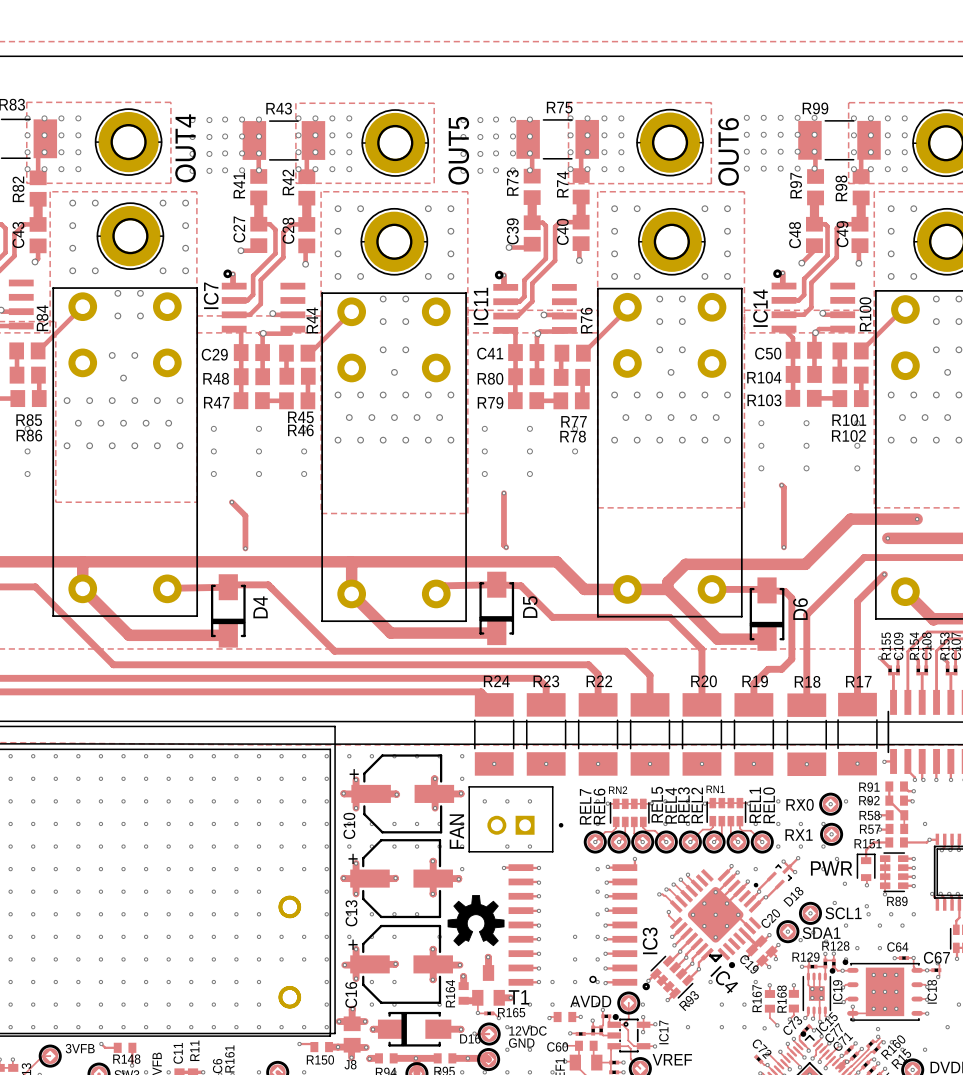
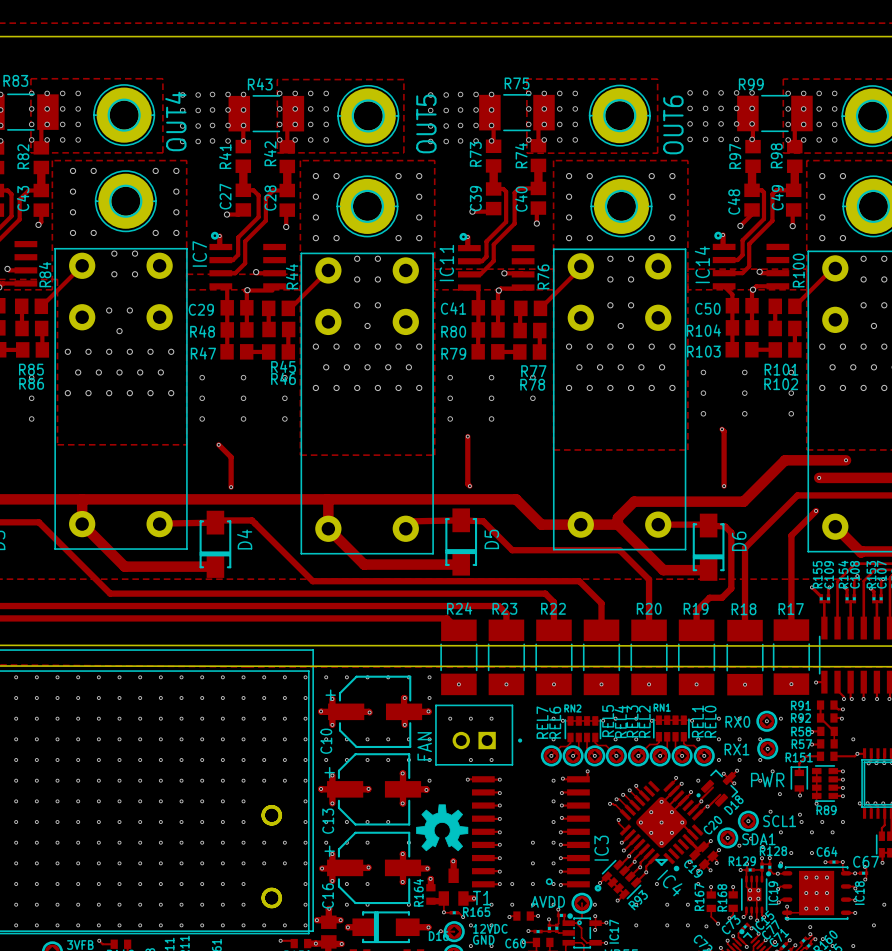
D18 footprint: [753, 864, 793, 890] -> [696, 769, 738, 807]

